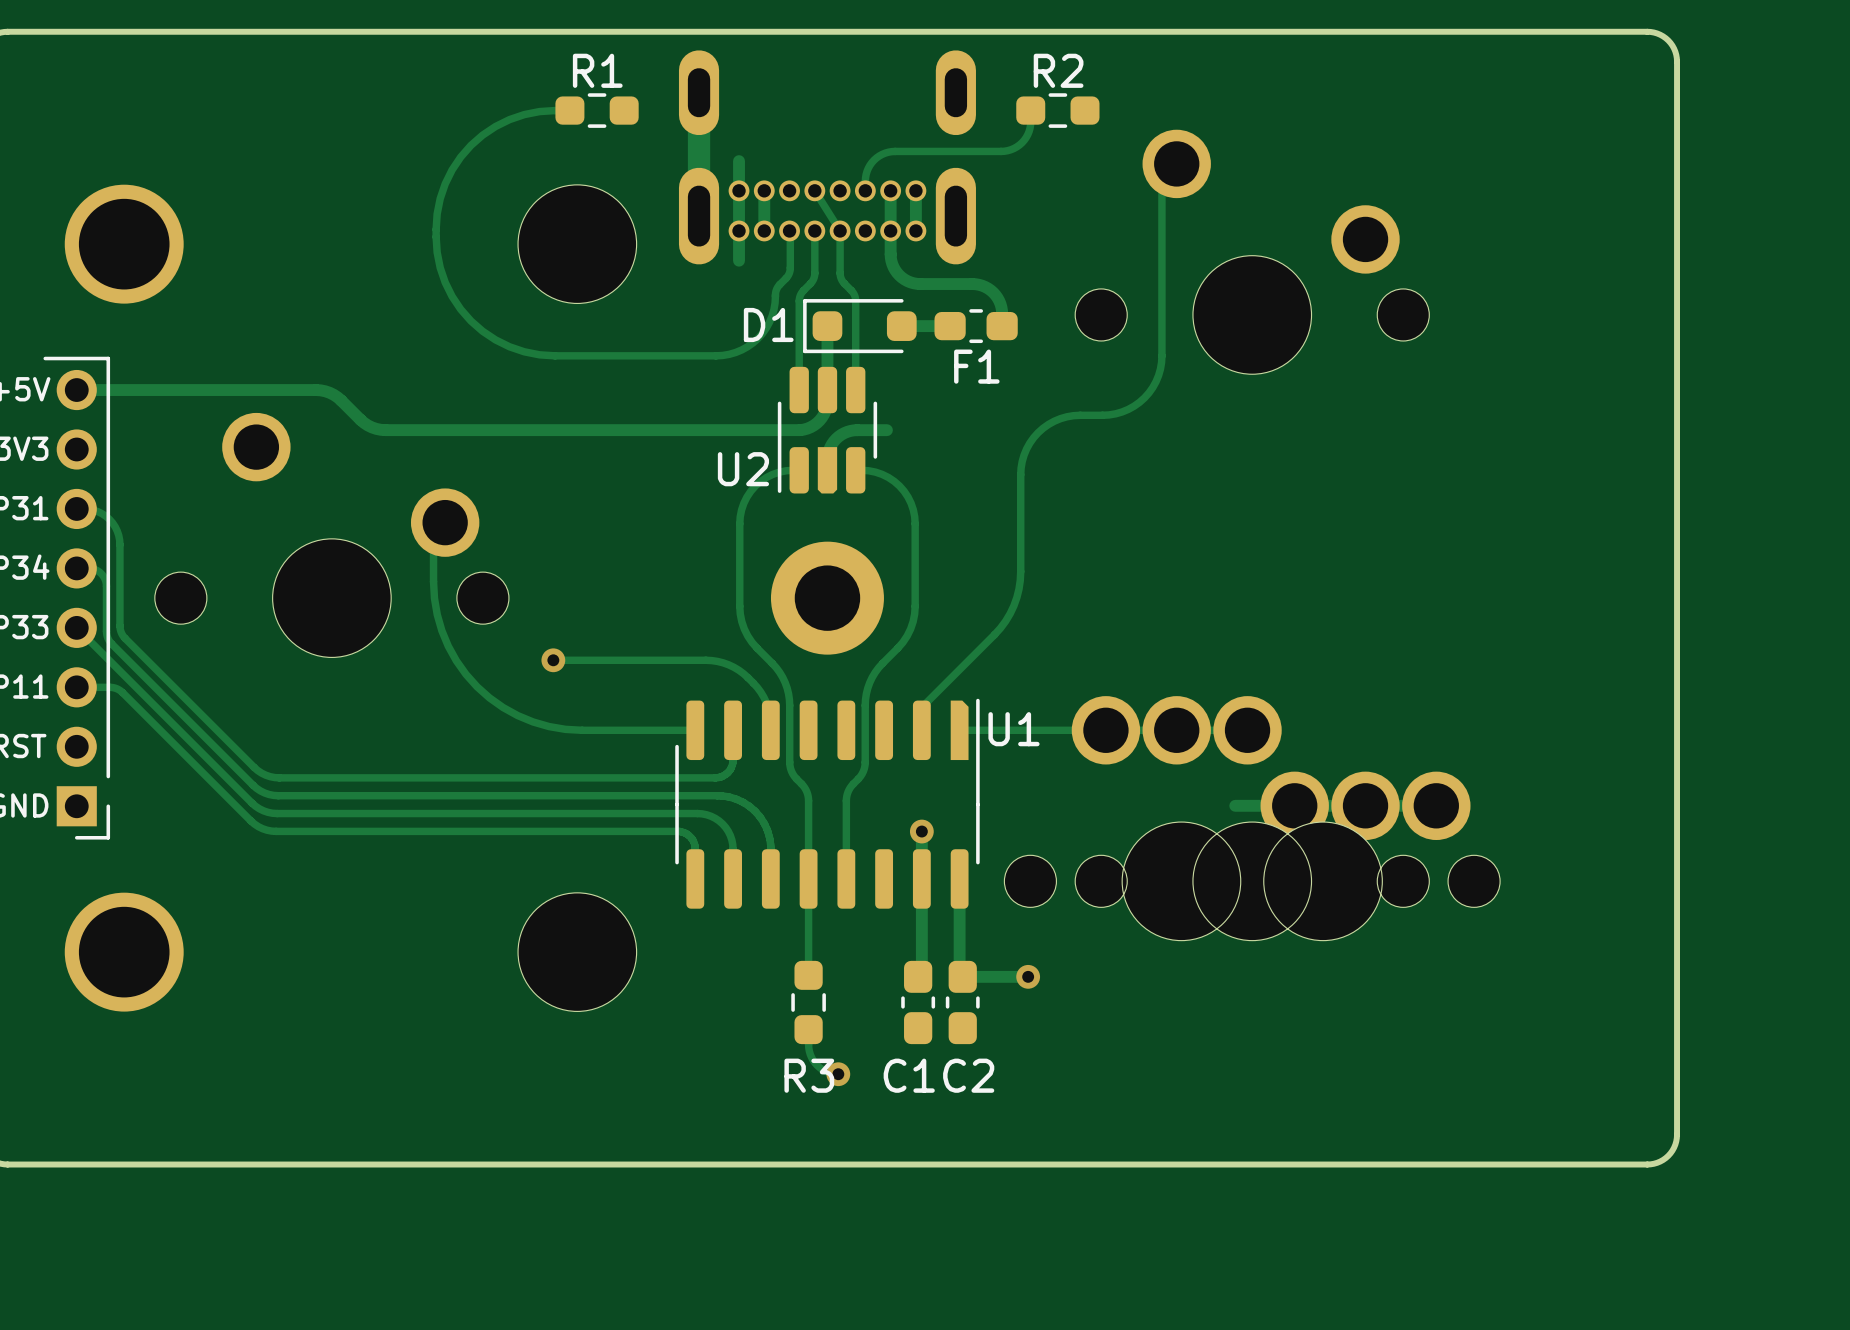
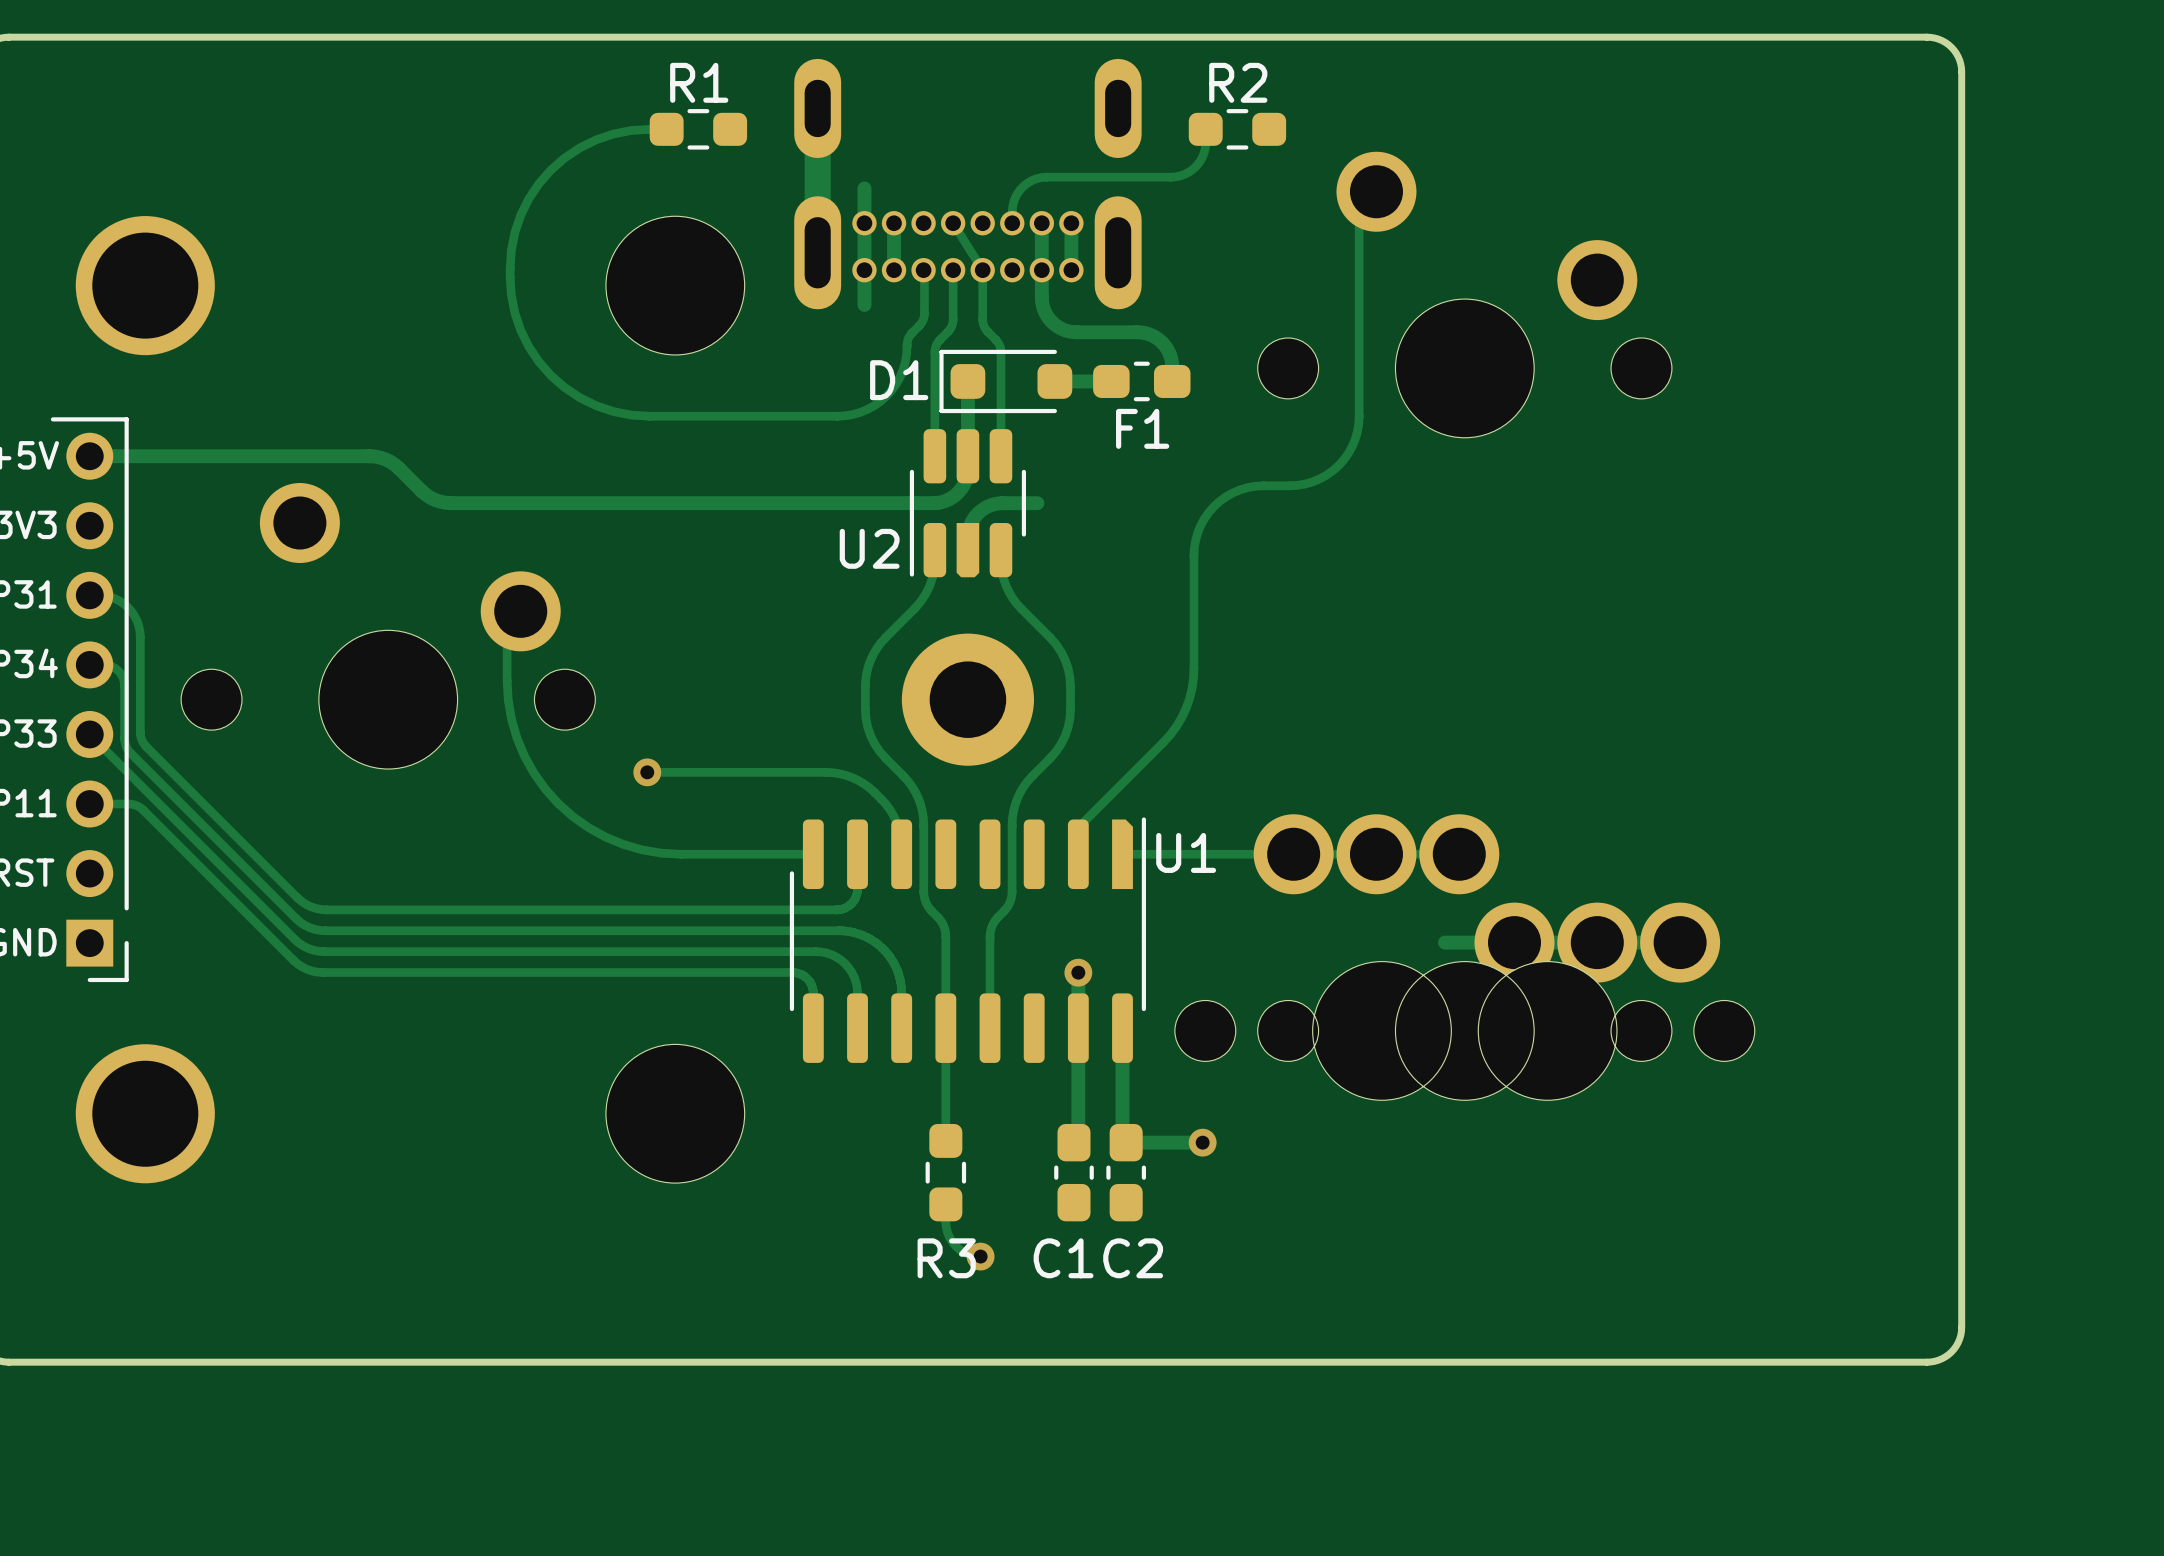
track: (793, 470) (772, 474) (760, 481) (750, 491) (743, 503) (739, 523) (739, 587) -> (934, 550) (932, 577) (925, 594) (877, 648) (868, 666) (865, 686)
track: (861, 470) (875, 472) (888, 477) (904, 491) (911, 503) (915, 523) (915, 587) -> (1000, 550) (1002, 573) (1009, 592) (1016, 603) (1050, 637) (1061, 651) (1068, 668) (1070, 686)

